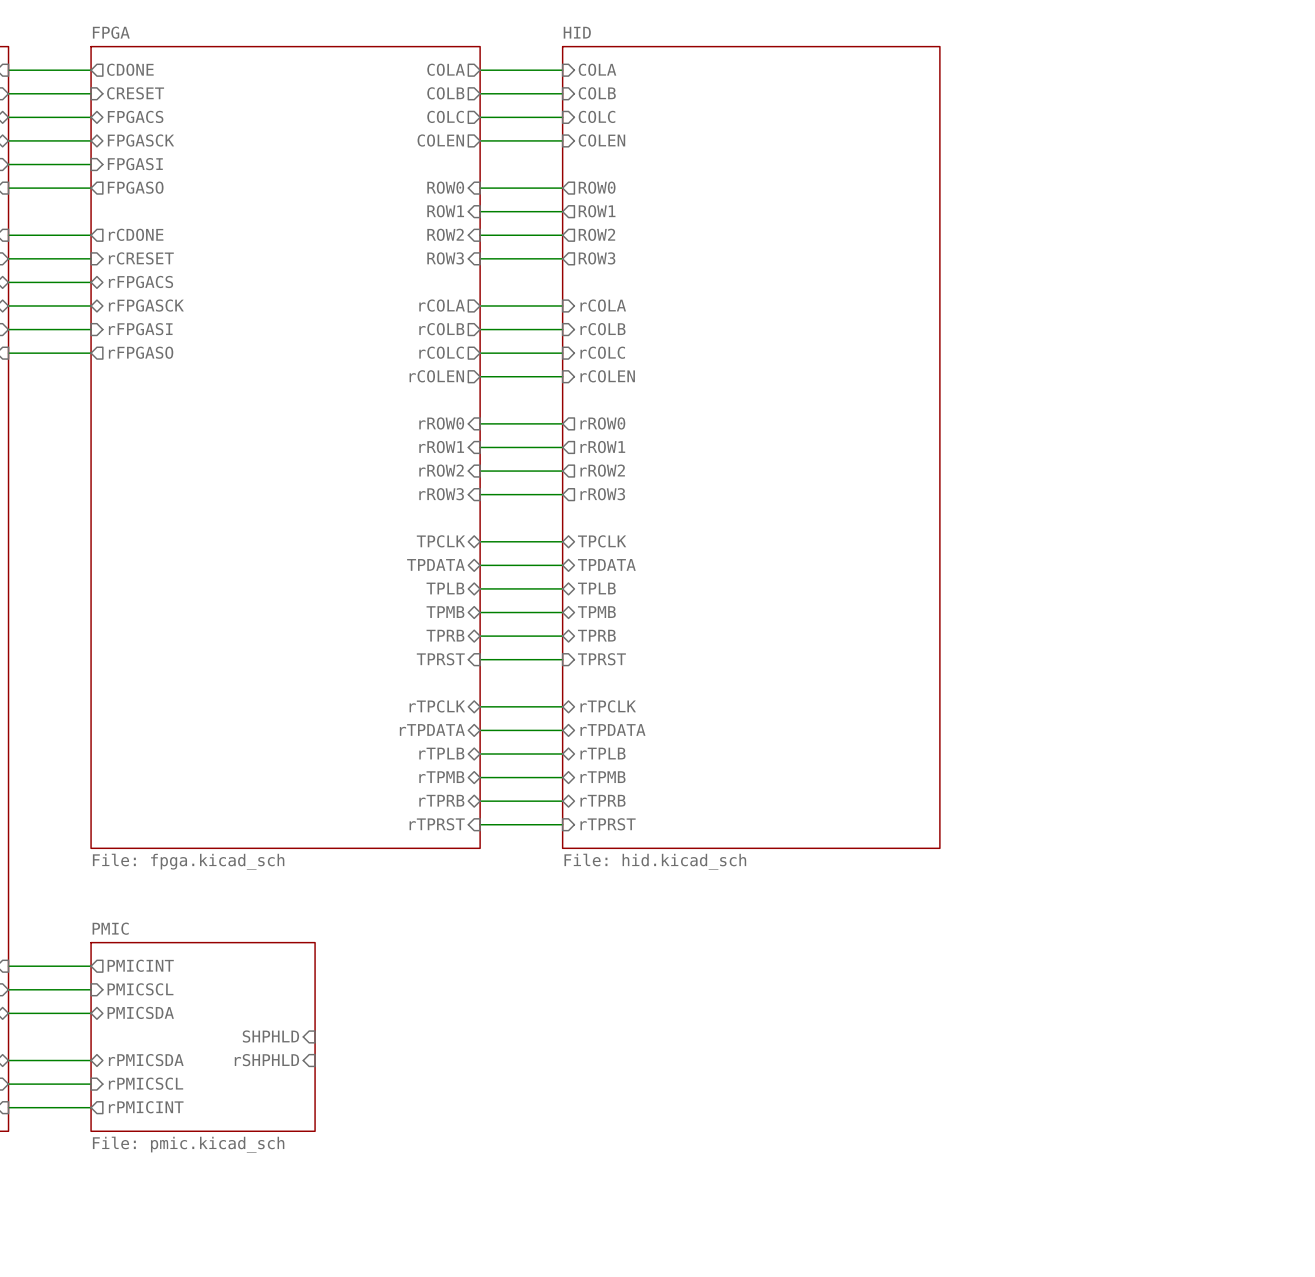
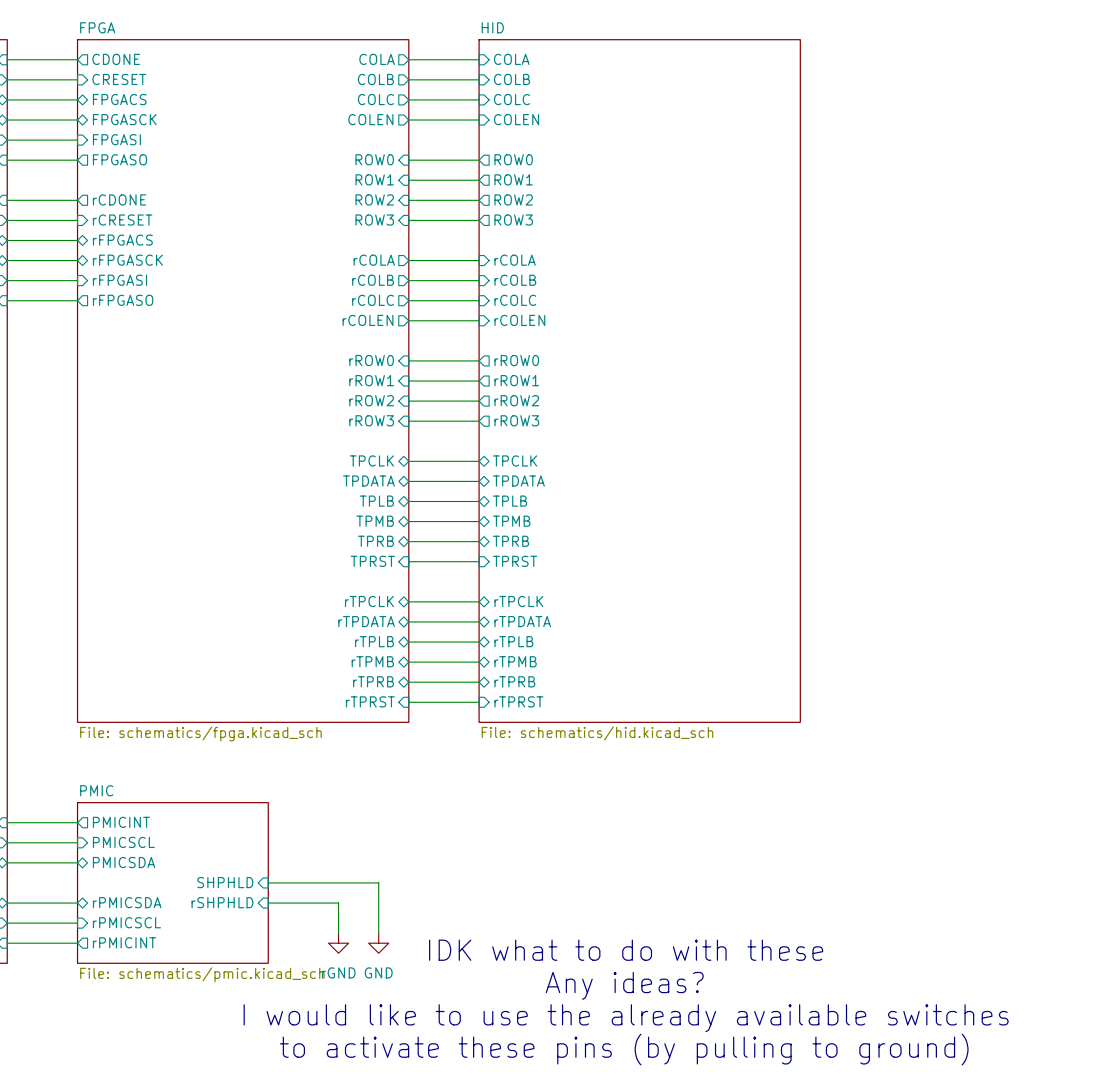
sheet FPGA value: File: fpga.kicad_sch (188, 861) -> File: schematics/fpga.kicad_sch (200, 733)
sheet HID value: File: hid.kicad_sch (655, 861) -> File: schematics/hid.kicad_sch (597, 733)
wire: none -> (268, 882) (378, 882) (378, 933)
wire: none -> (268, 903) (338, 903) (338, 933)
power symbol: none -> rGND (338, 943)
power symbol: none -> GND (378, 943)
text: none -> IDK what to do with these (626, 950)
sheet PMIC value: File: pmic.kicad_sch (188, 1144) -> File: schematics/pmic.kicad_sch (202, 974)
text: none -> Any ideas? (624, 985)
text: none -> I would like to use the already available switches (626, 1018)
text: none -> to activate these pins (by pulling to ground) (624, 1049)

